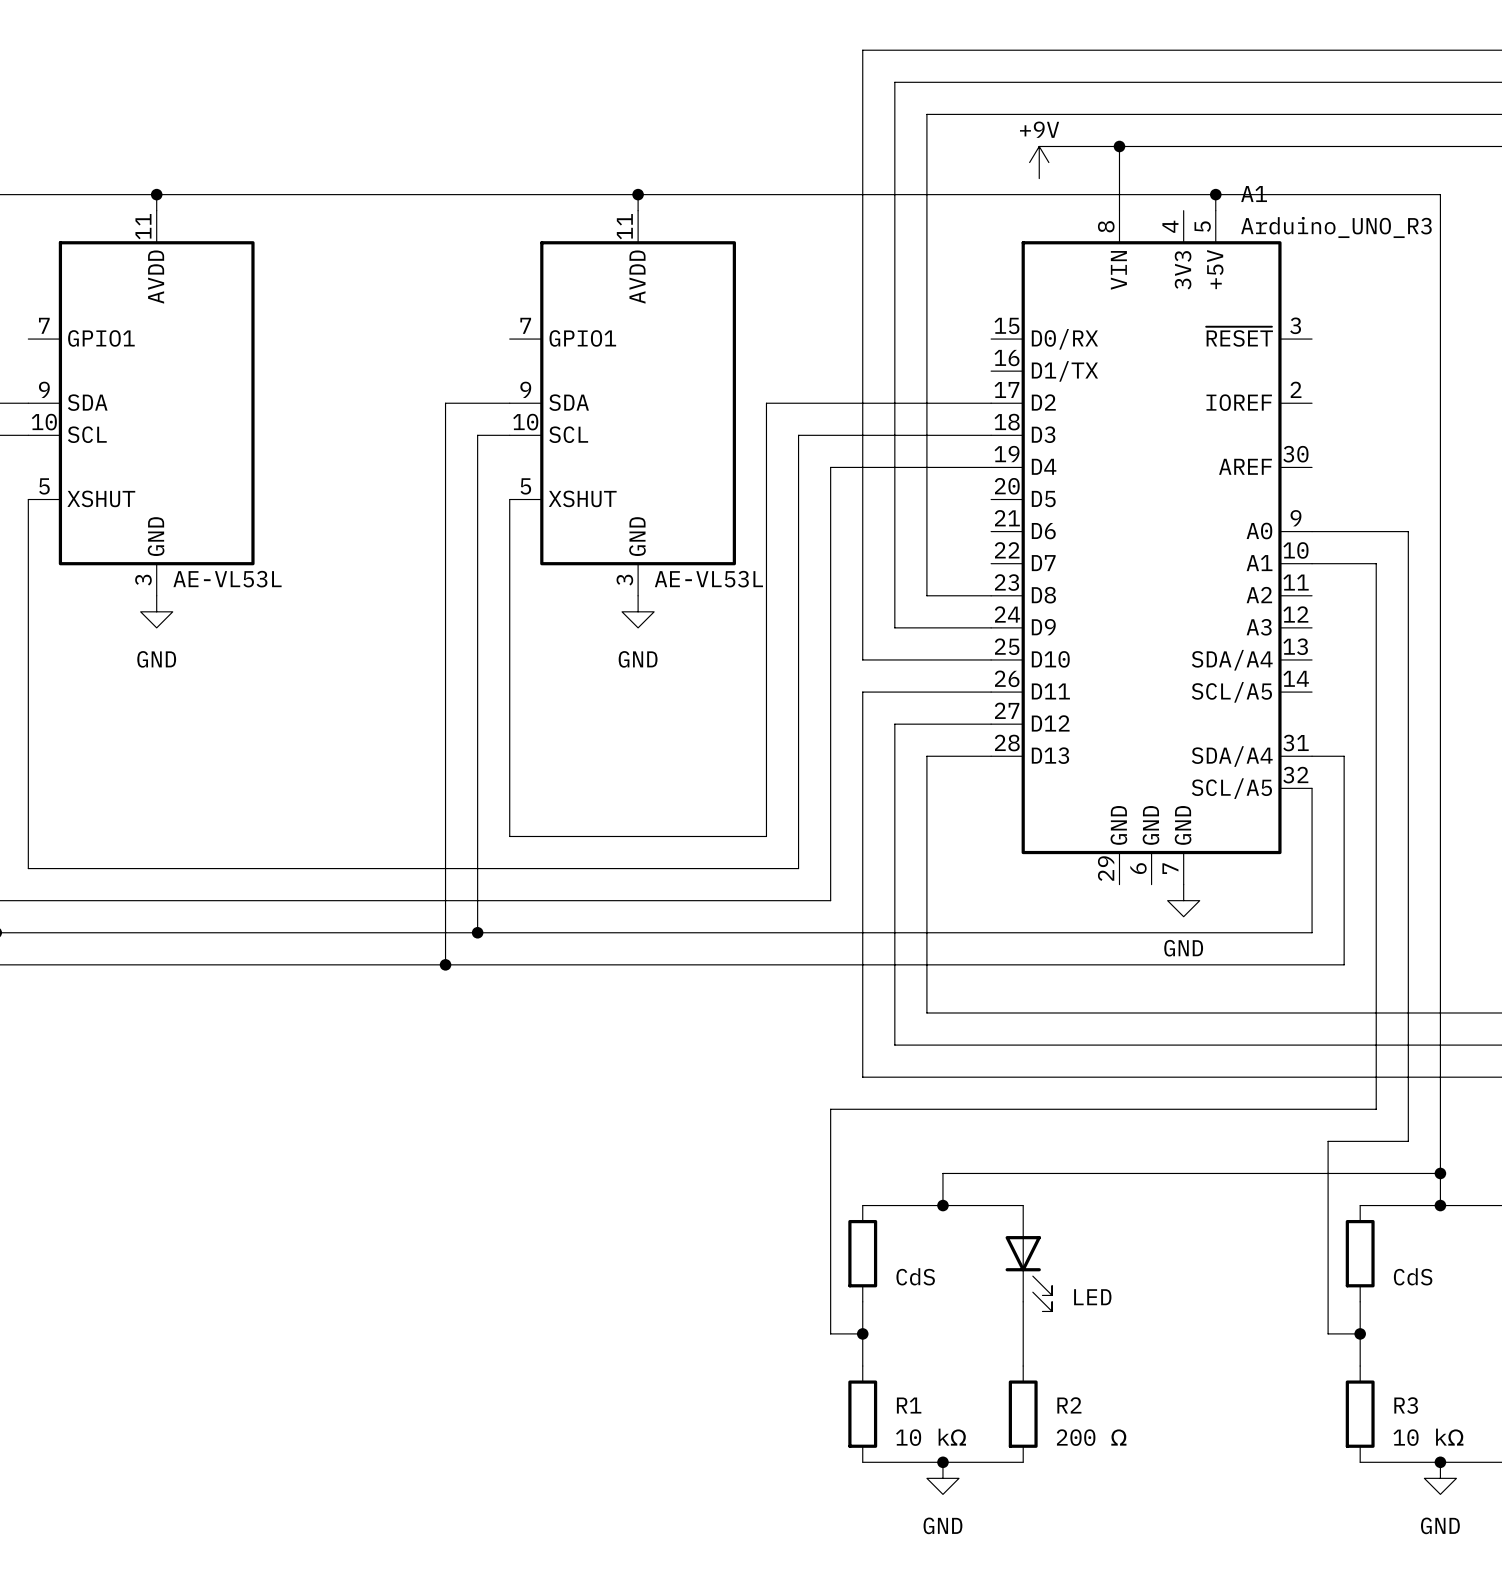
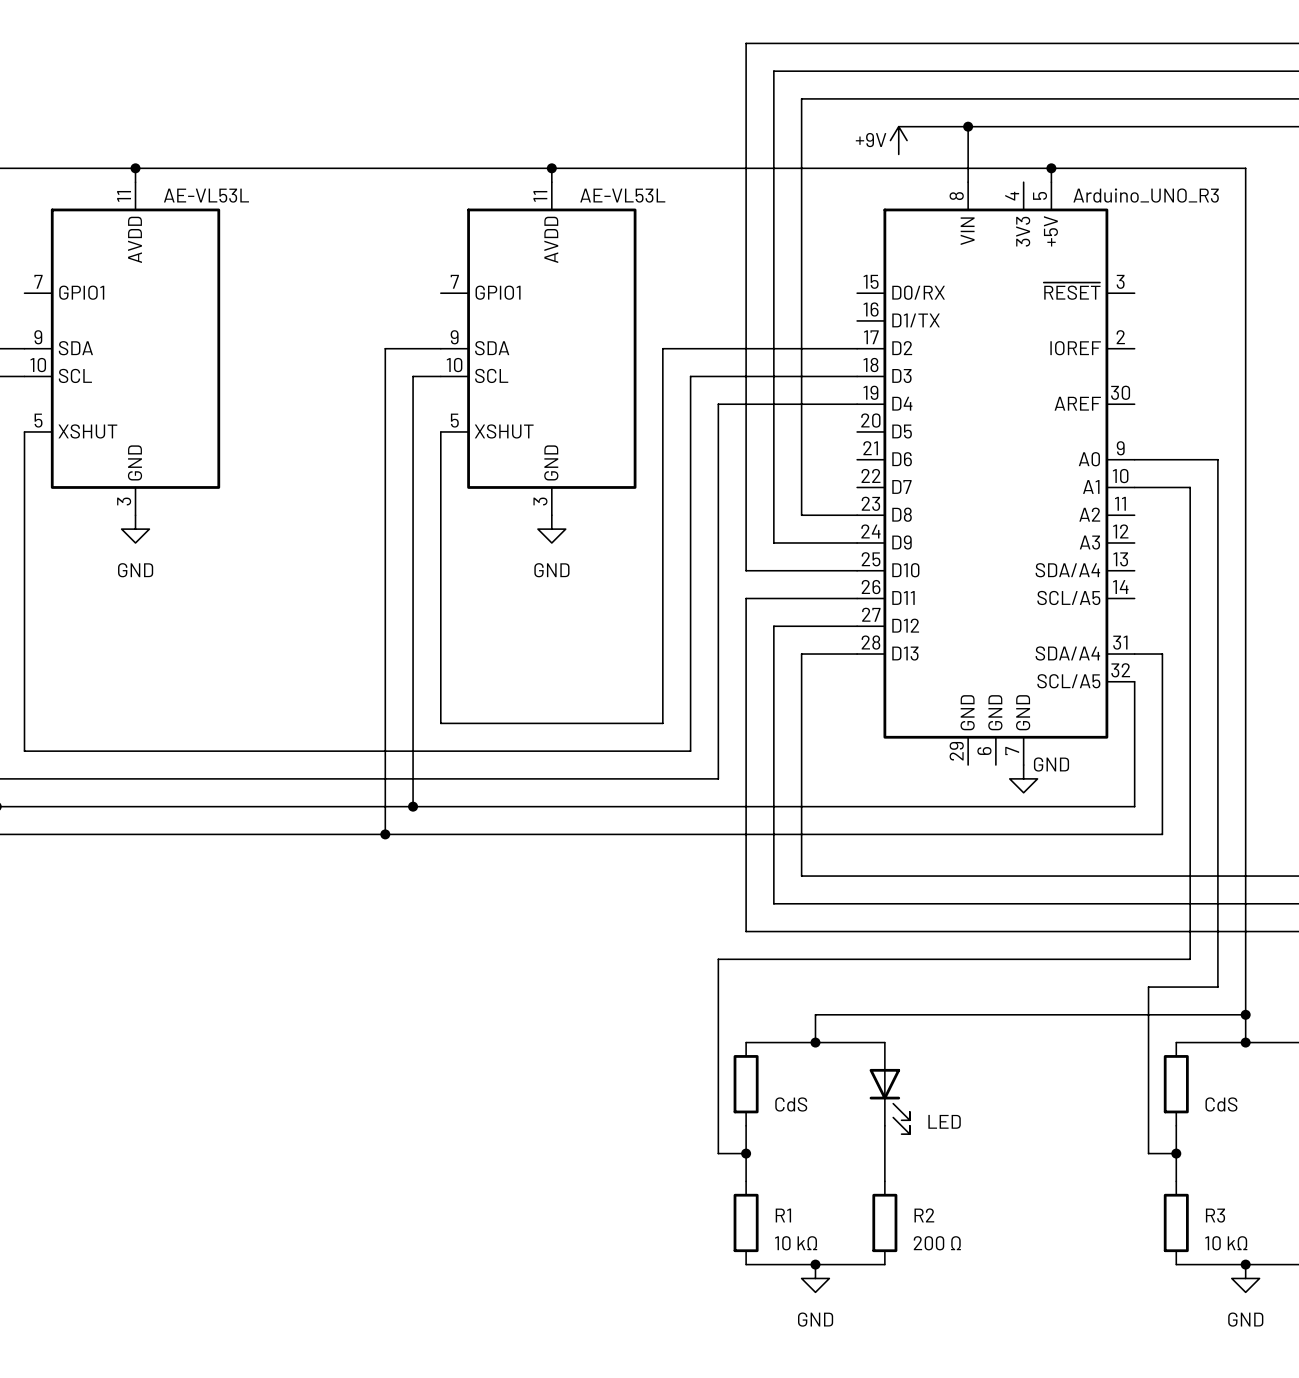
power symbol text position: +9V (1039, 129) -> +9V (871, 140)
A1 name: A1 (1254, 194) -> none
part value position: AE-VL53L (227, 579) -> AE-VL53L (206, 195)
part value position: AE-VL53L (708, 579) -> AE-VL53L (622, 195)
power symbol text position: GND (1183, 948) -> GND (1051, 764)

